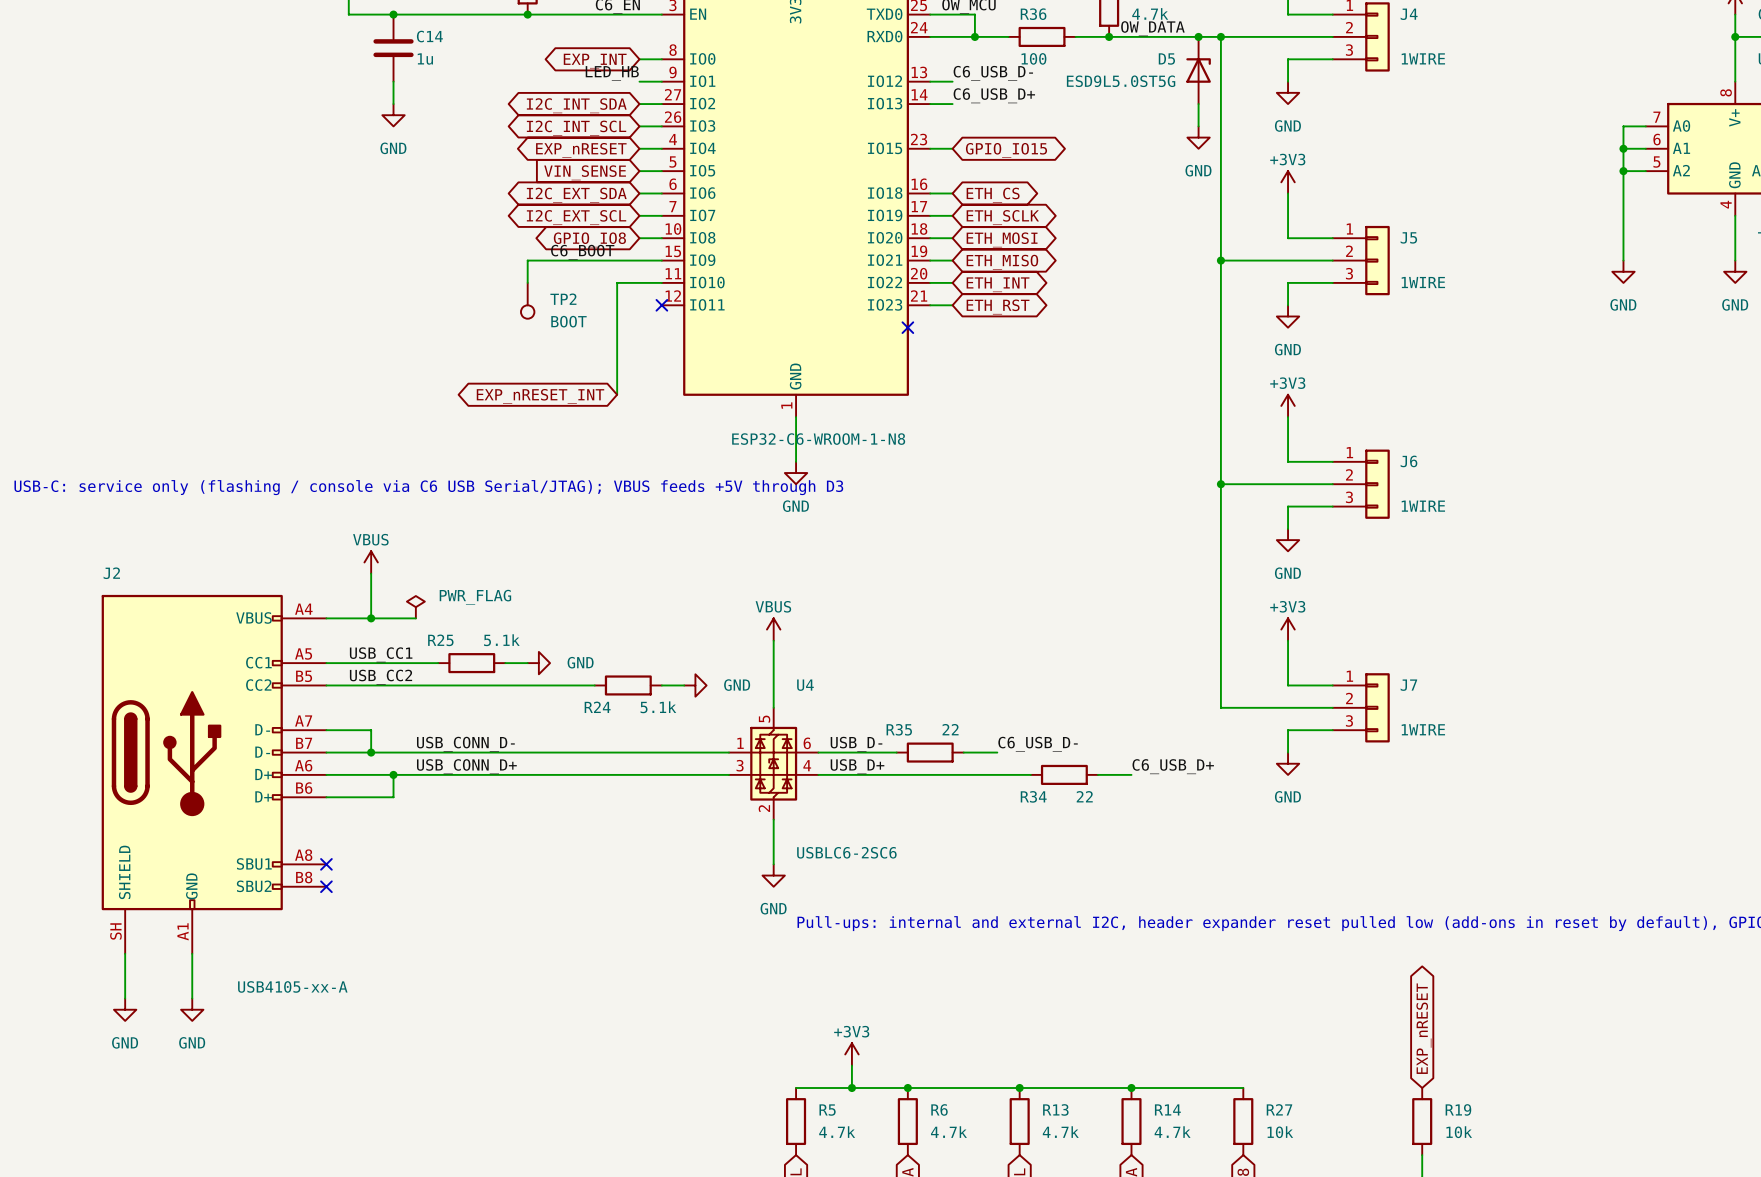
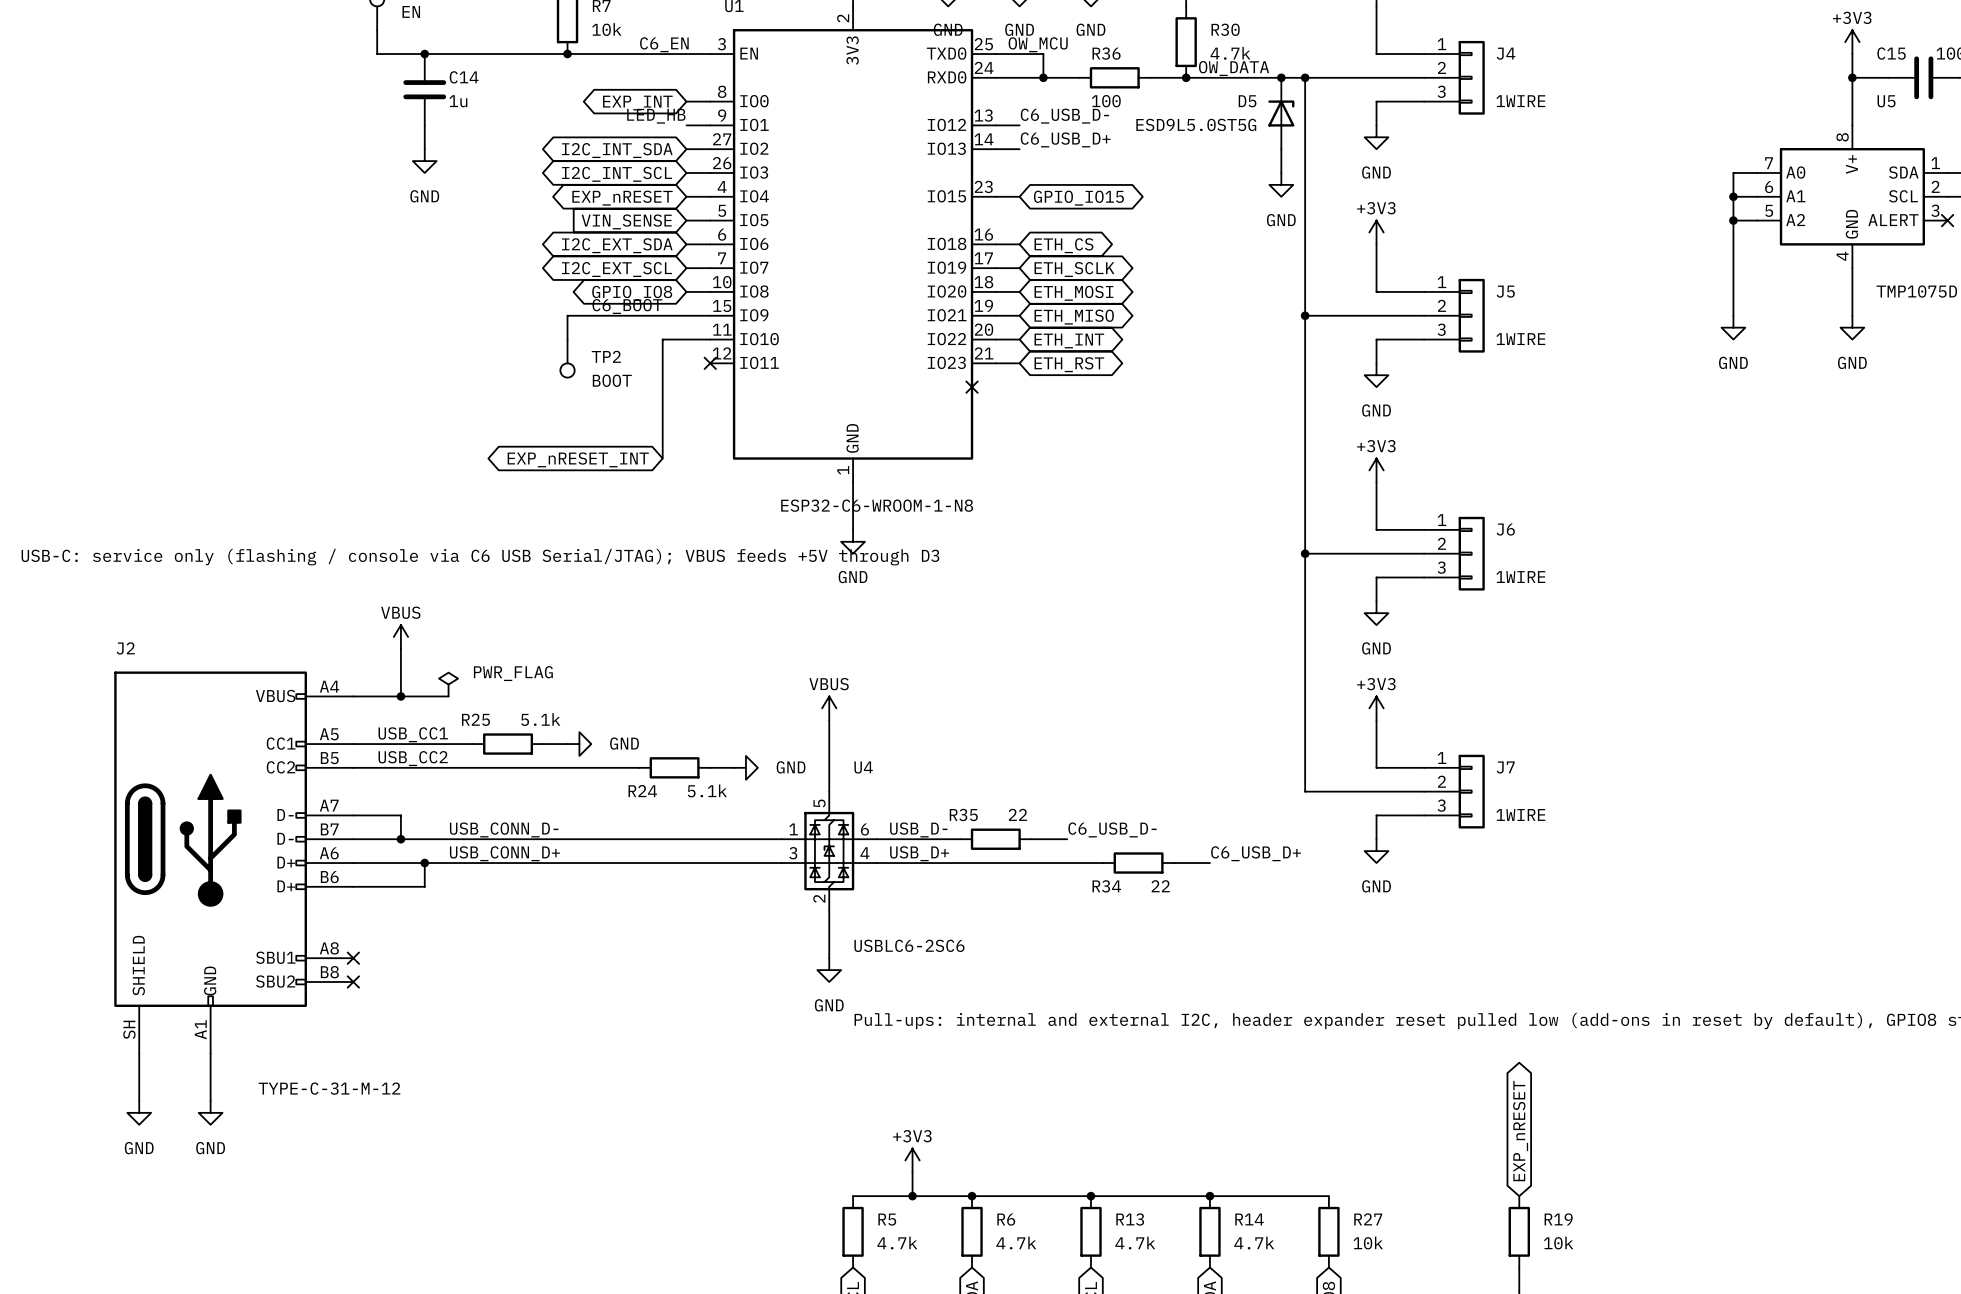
J2 value: USB4105-xx-A (292, 986) -> TYPE-C-31-M-12 (329, 1088)

